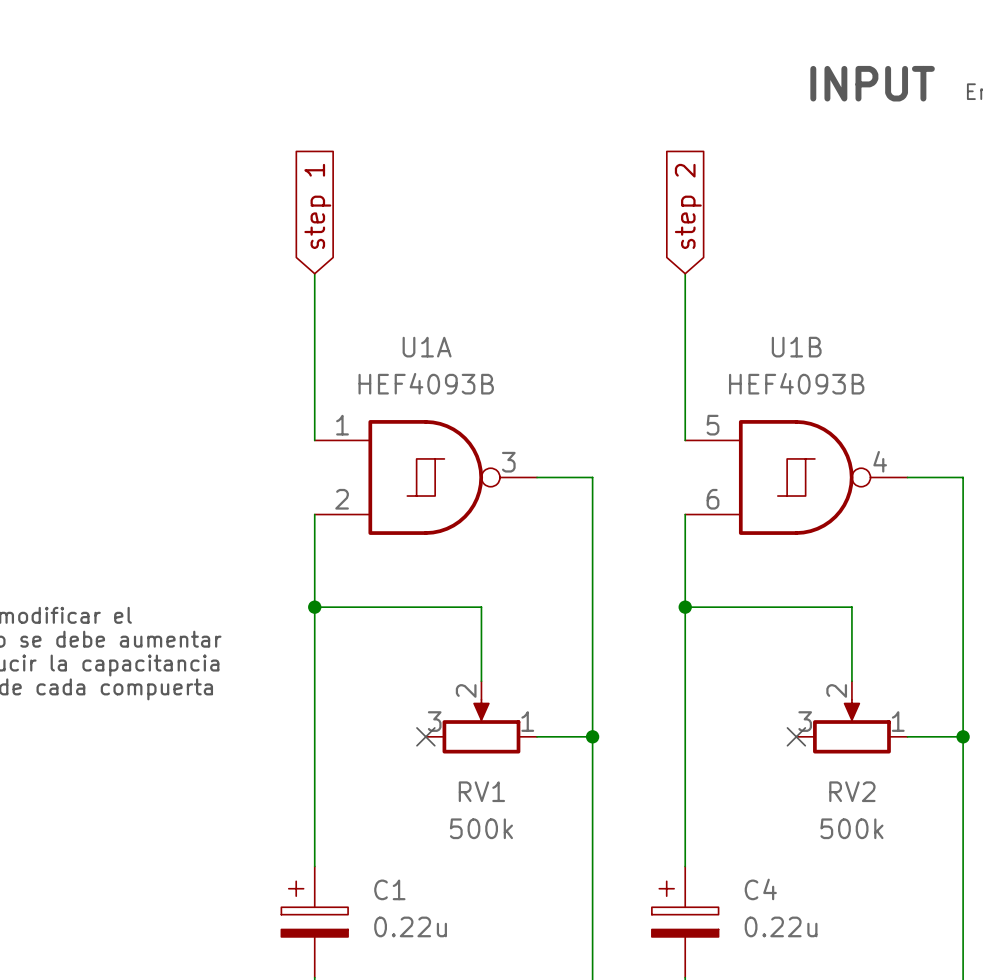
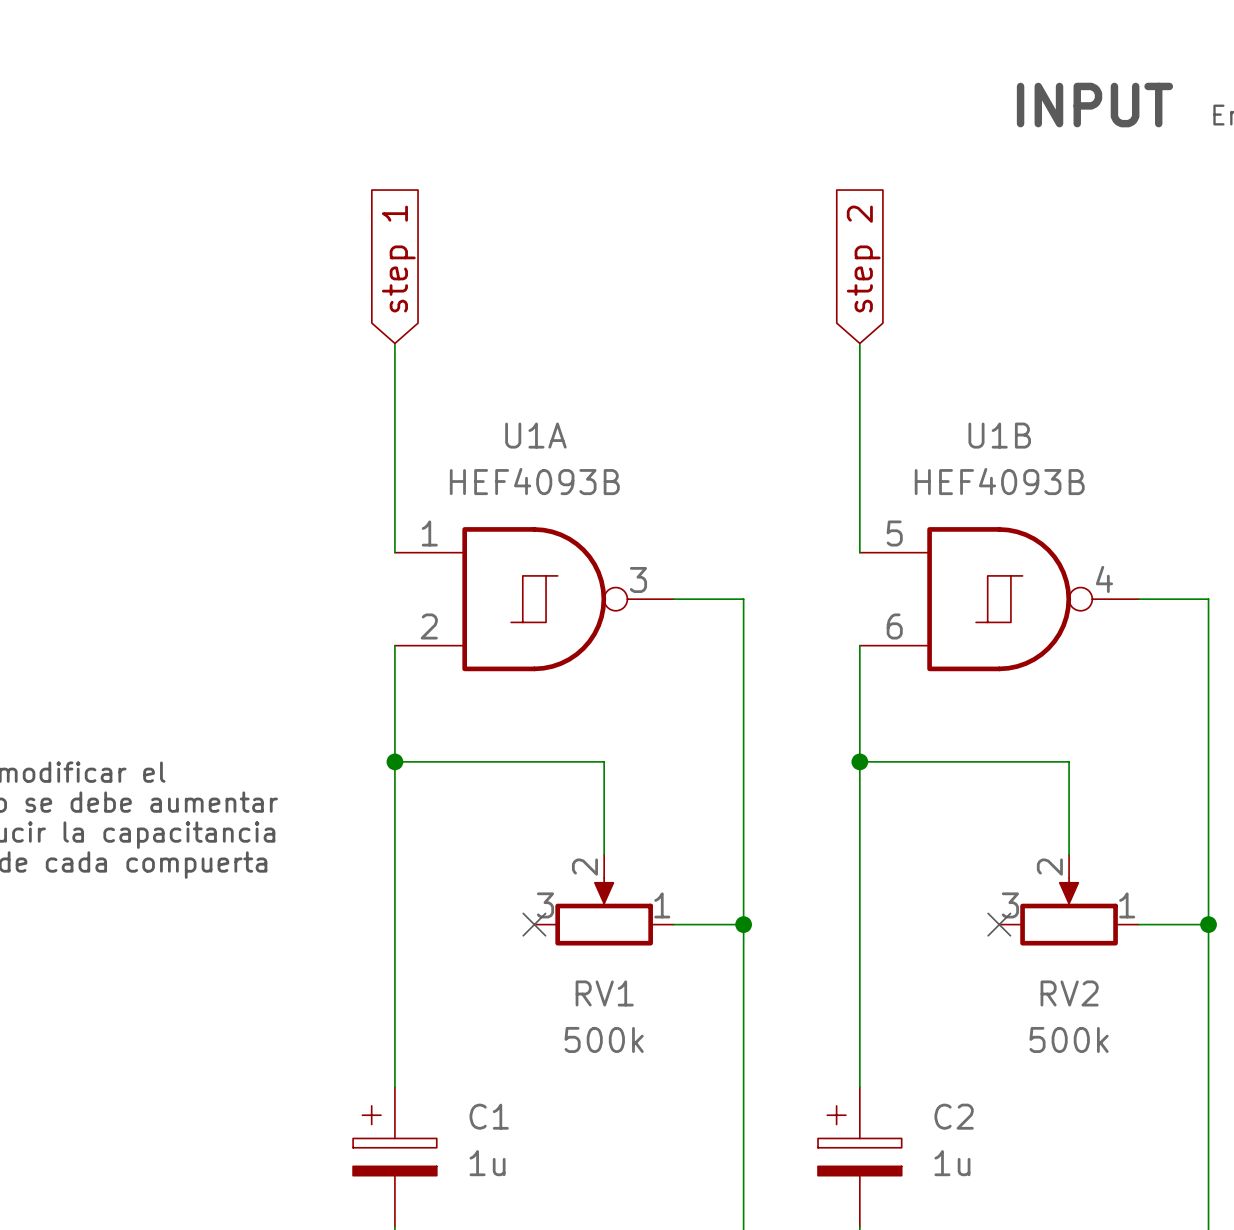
C4 name: C4 (760, 889) -> C2 (954, 1116)
C1 value: 0.22u (410, 926) -> 1u (487, 1163)
C4 value: 0.22u (781, 926) -> 1u (952, 1163)

